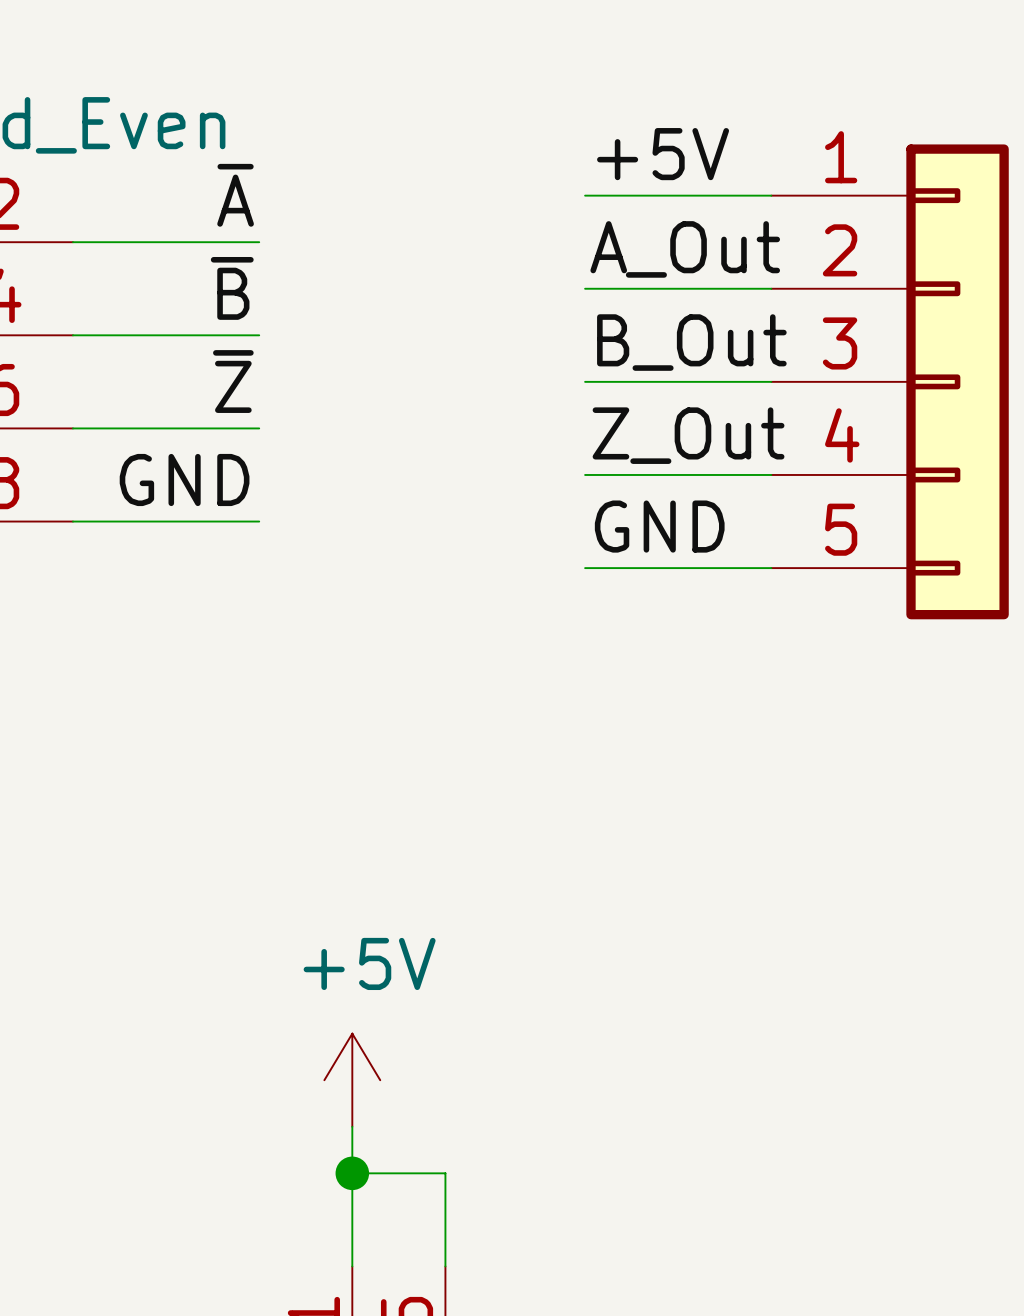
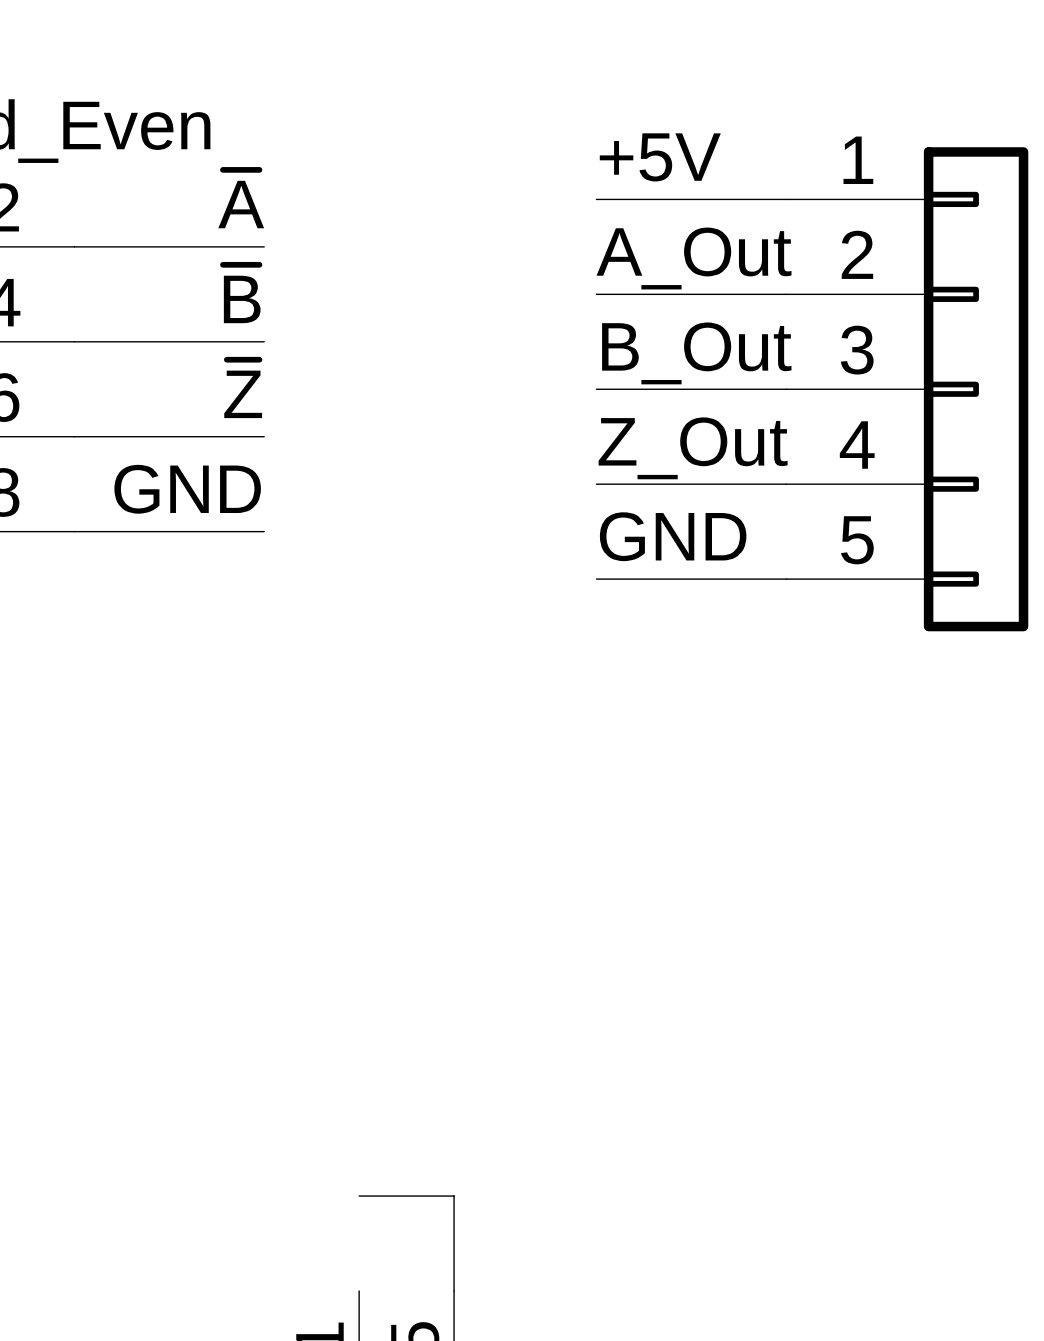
power symbol: +5V (352, 1080) -> none
wire: (352, 1126) (352, 1266) -> none
junction: (352, 1173) -> none

